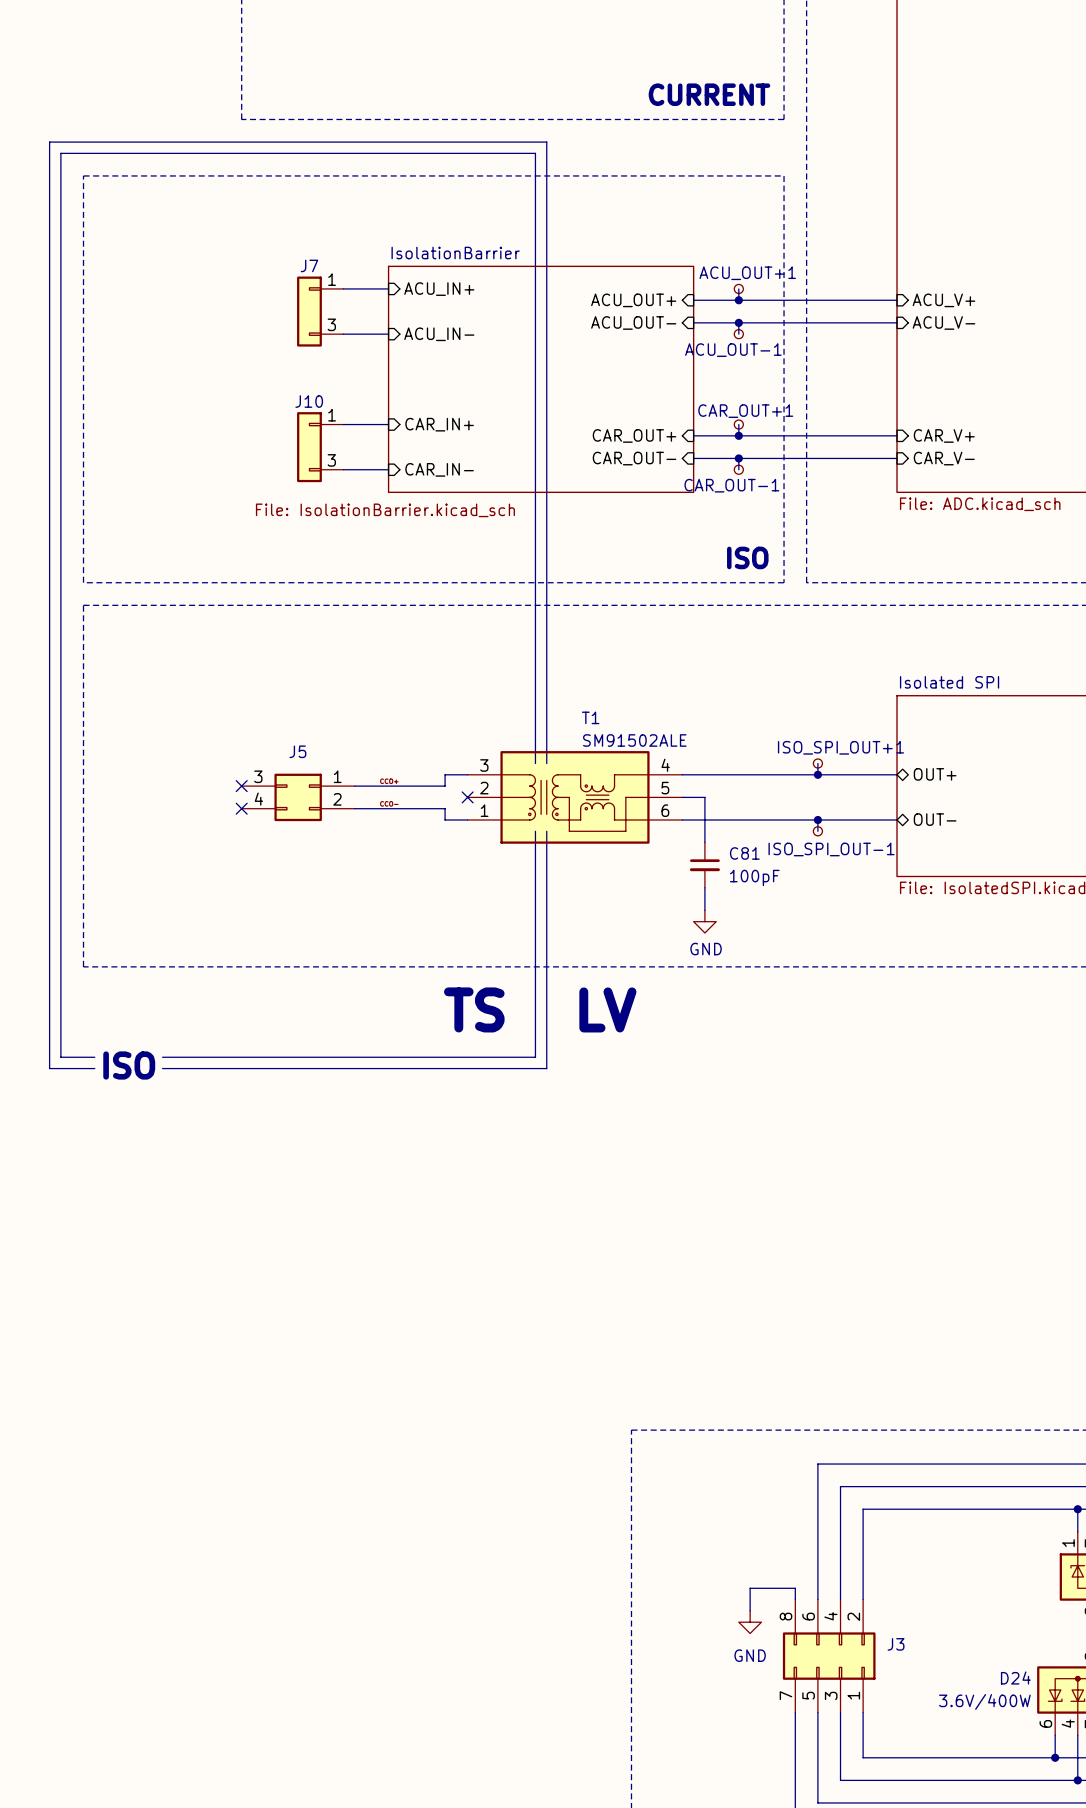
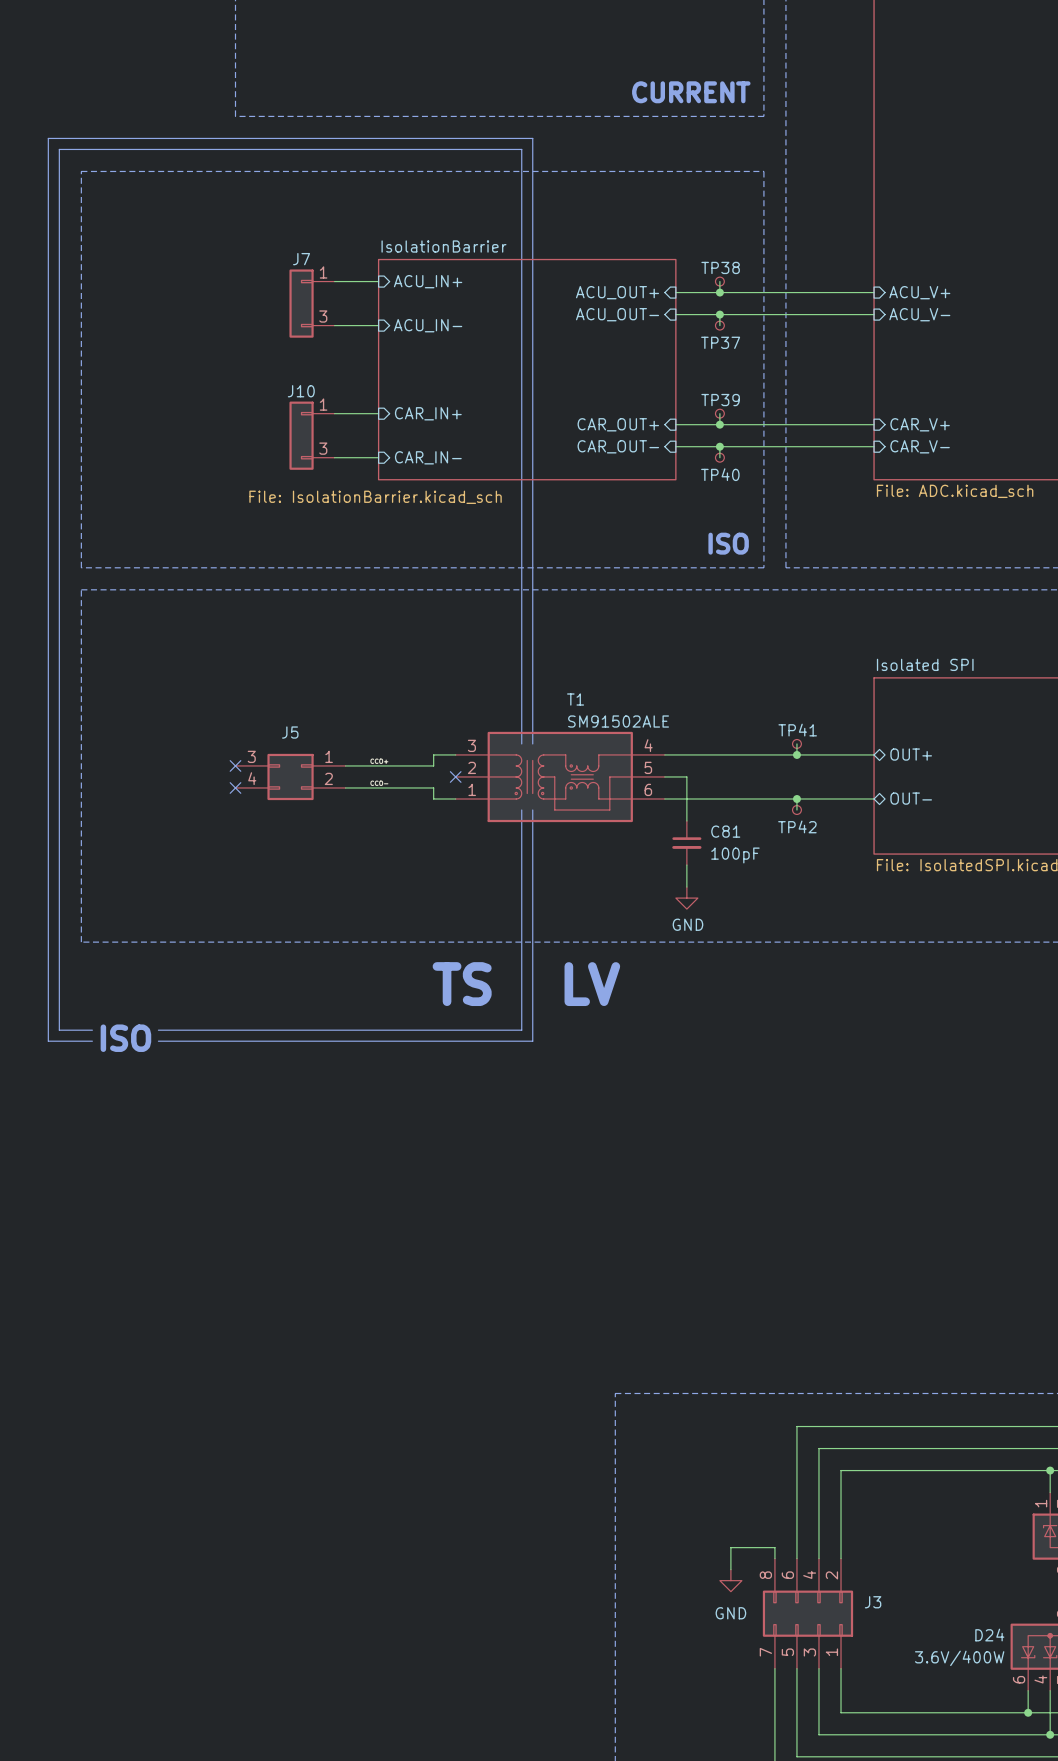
ACU_OUT+1 name: ACU_OUT+1 (747, 273) -> TP38 (720, 267)
ACU_OUT-1 name: ACU_OUT-1 (733, 350) -> TP37 (720, 342)
CAR_OUT+1 name: CAR_OUT+1 (745, 411) -> TP39 (720, 400)
CAR_OUT-1 name: CAR_OUT-1 (731, 485) -> TP40 (720, 474)
ISO_SPI_OUT+1 name: ISO_SPI_OUT+1 (840, 747) -> TP41 (797, 730)
ISO_SPI_OUT-1 name: ISO_SPI_OUT-1 (831, 849) -> TP42 (797, 826)

